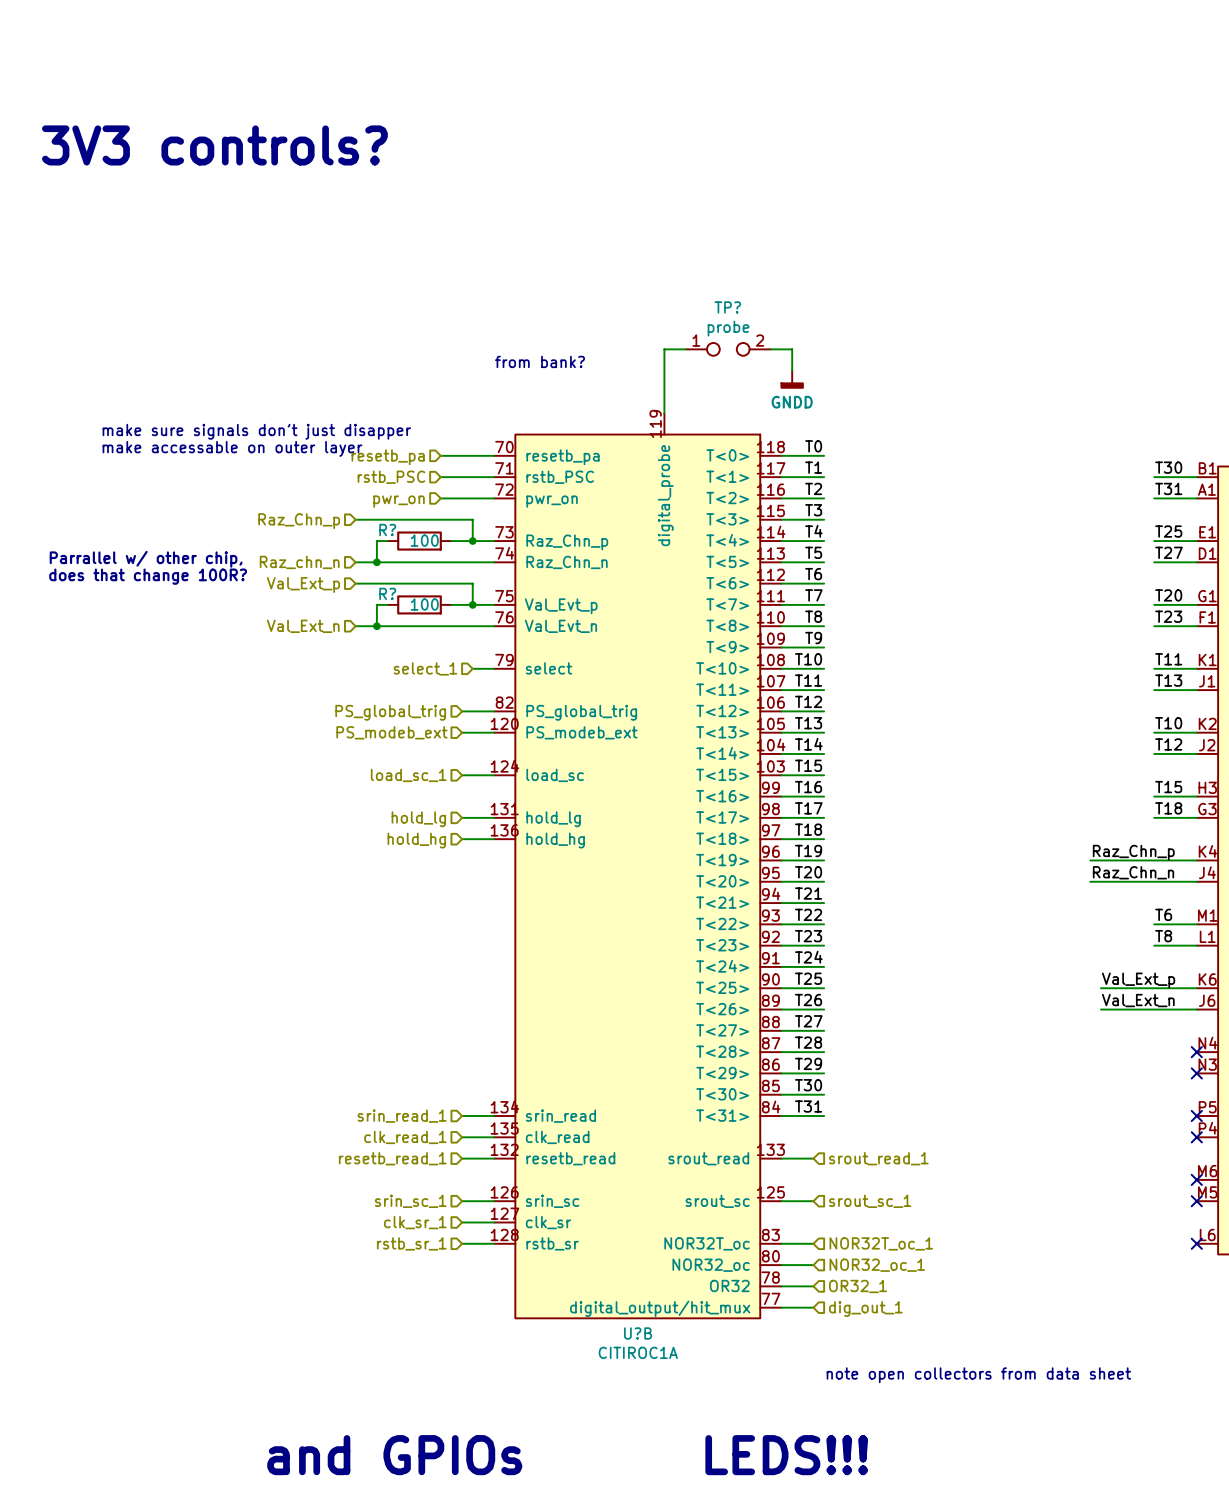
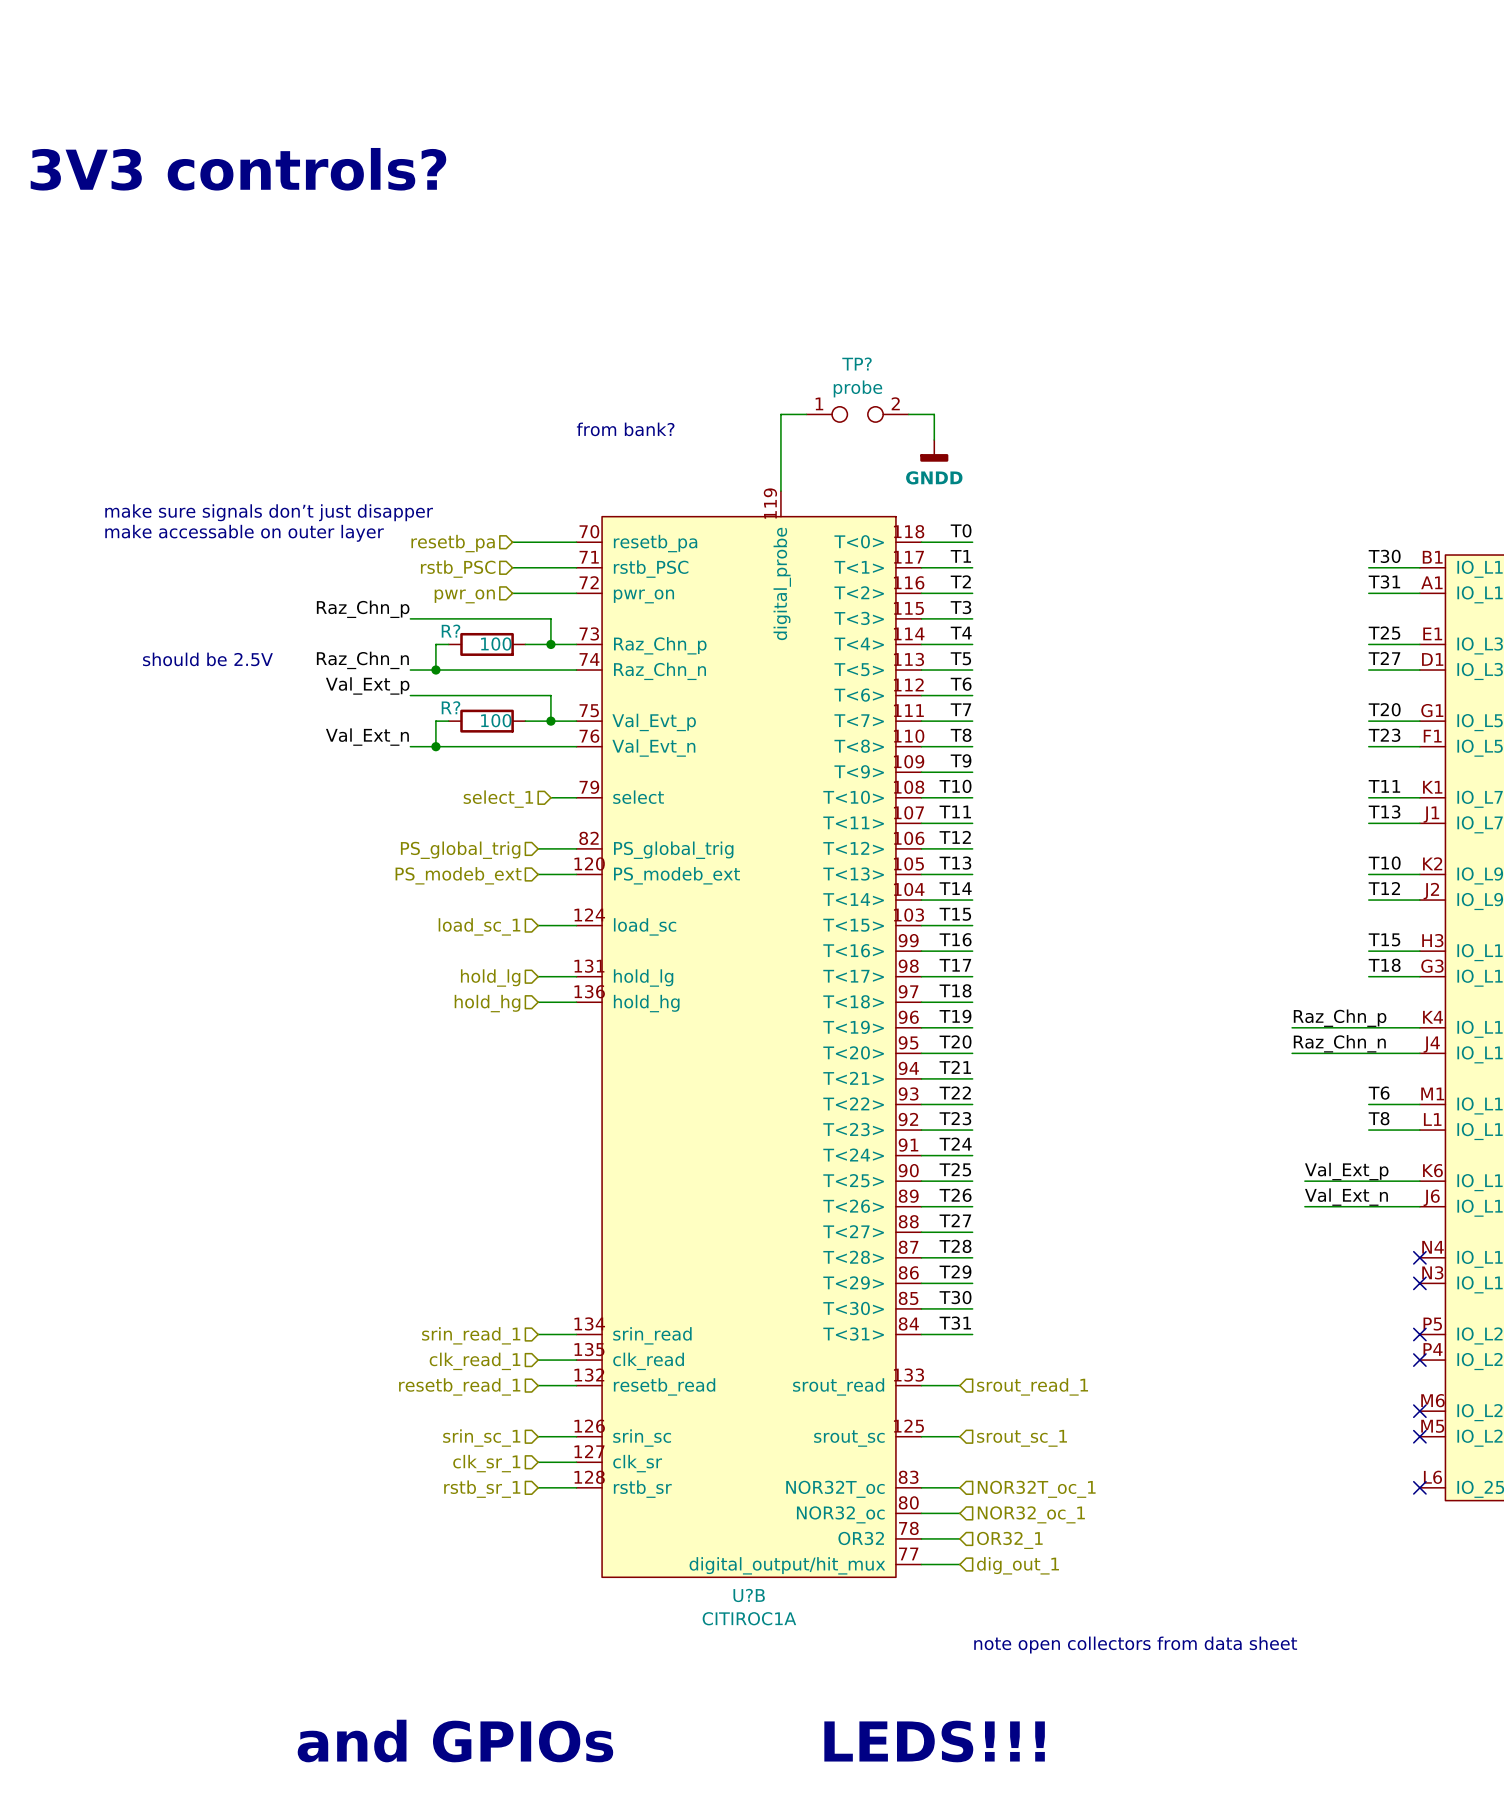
label: none -> Raz_Chn_p (363, 609)
hierarchical label: Raz_Chn_p (299, 521) -> none
text: none -> should be 2.5V (207, 659)
label: none -> Raz_Chn_n (362, 660)
text: Parrallel w/ other chip, (146, 559) -> none
hierarchical label: Raz_chn_n (299, 562) -> none
label: none -> Val_Ext_p (367, 685)
text: does that change 100R? (148, 576) -> none
hierarchical label: Val_Ext_p (303, 585) -> none
label: none -> Val_Ext_n (367, 737)
hierarchical label: Val_Ext_n (303, 626) -> none

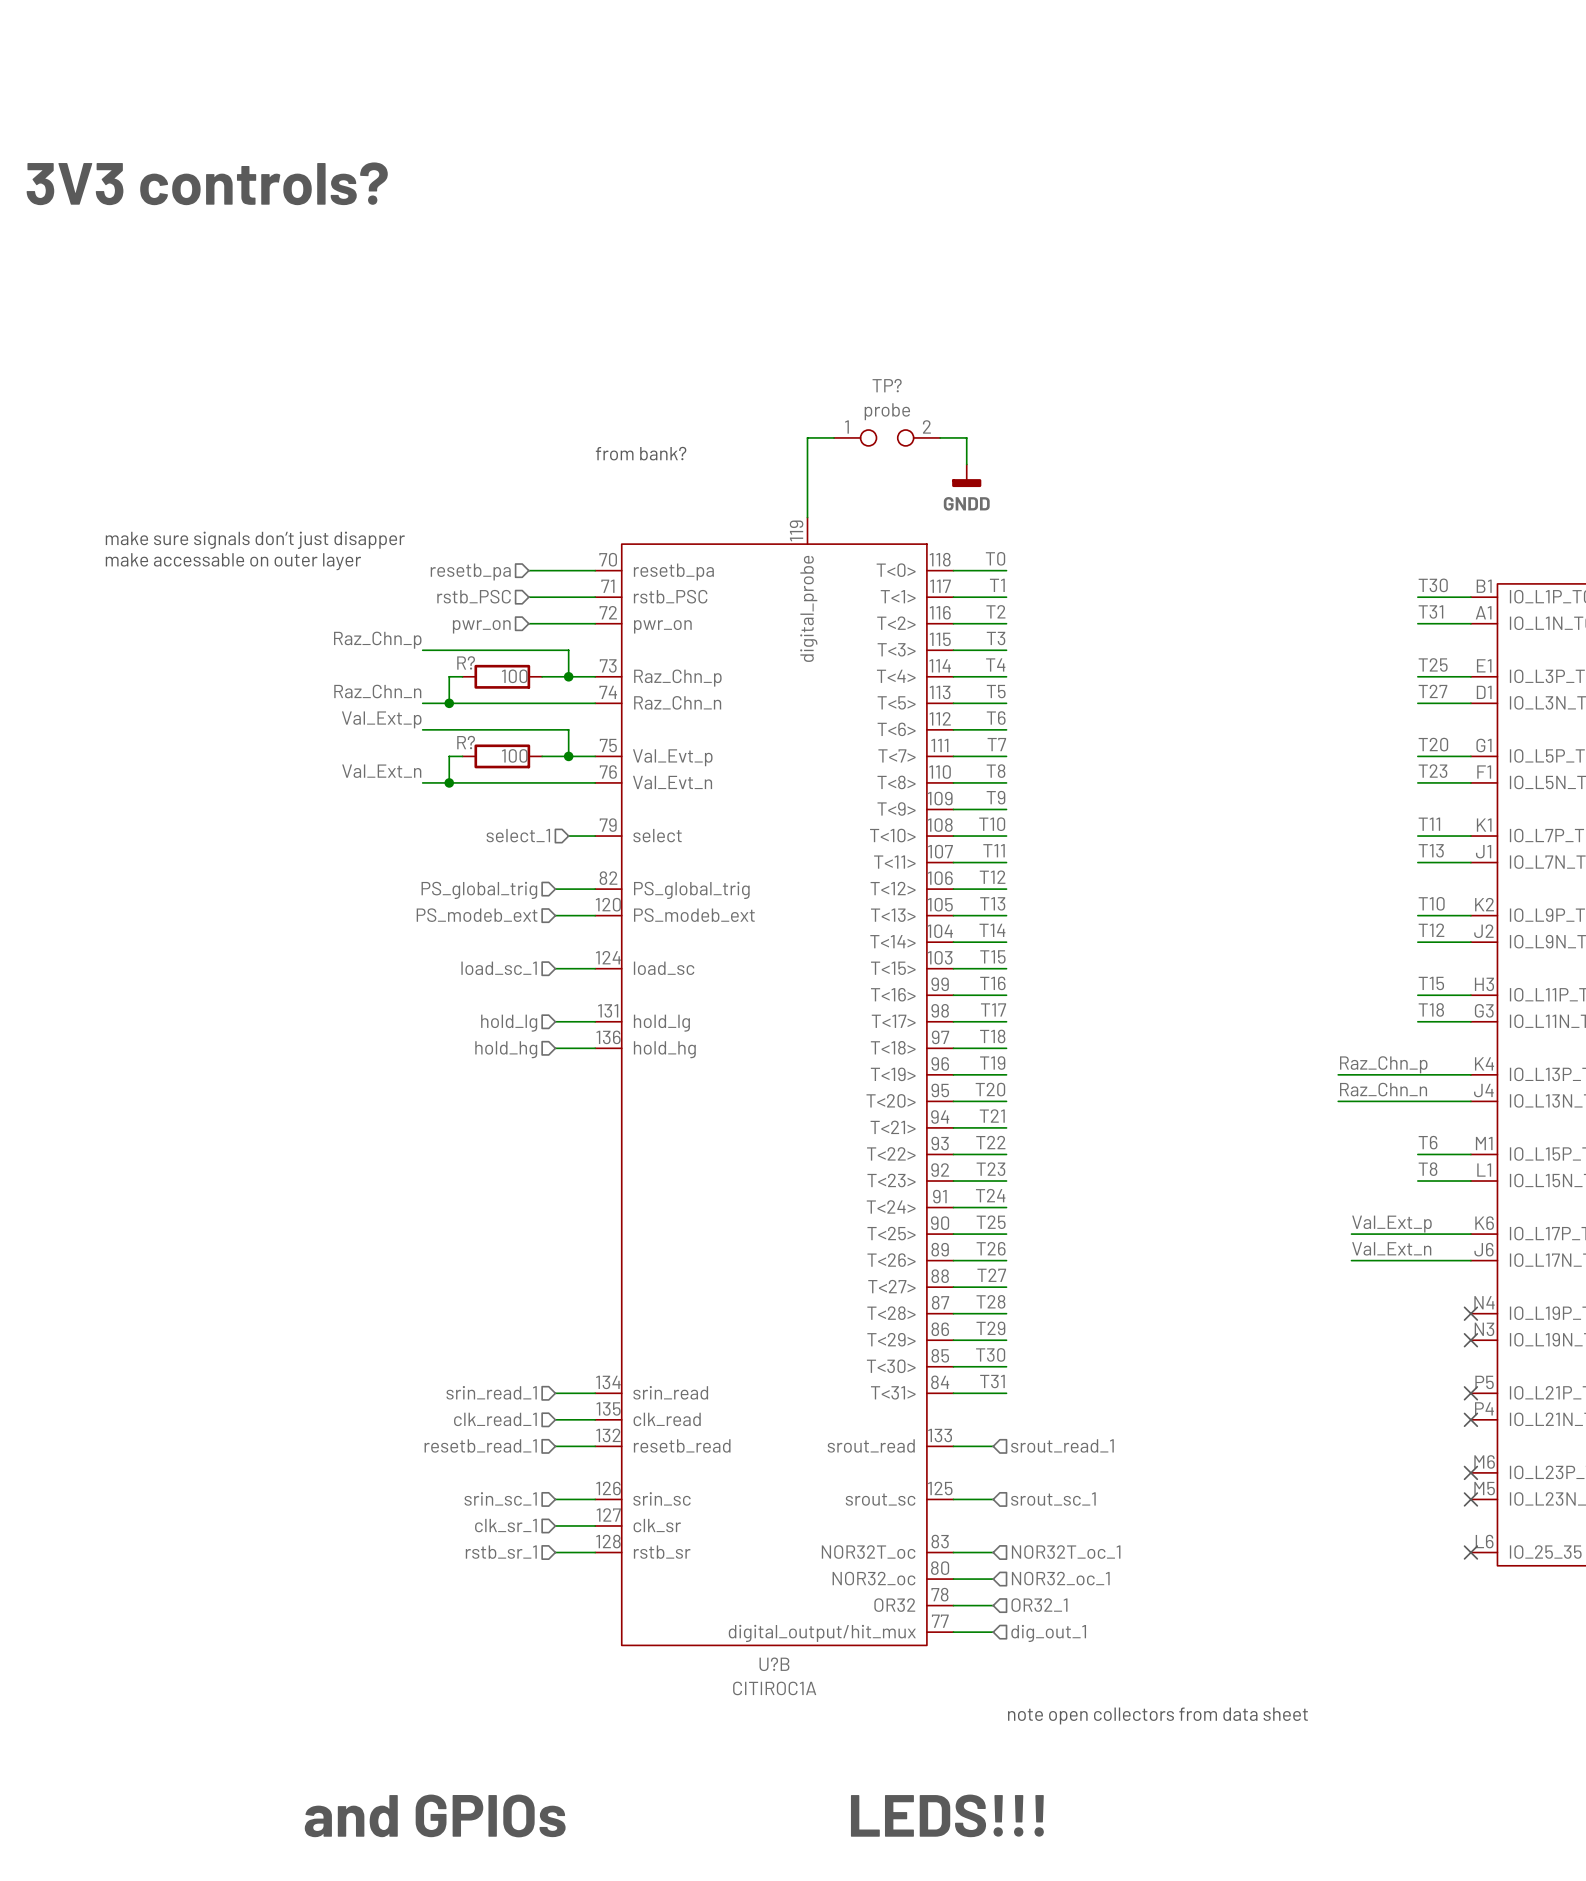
text: should be 2.5V (207, 659) -> none

